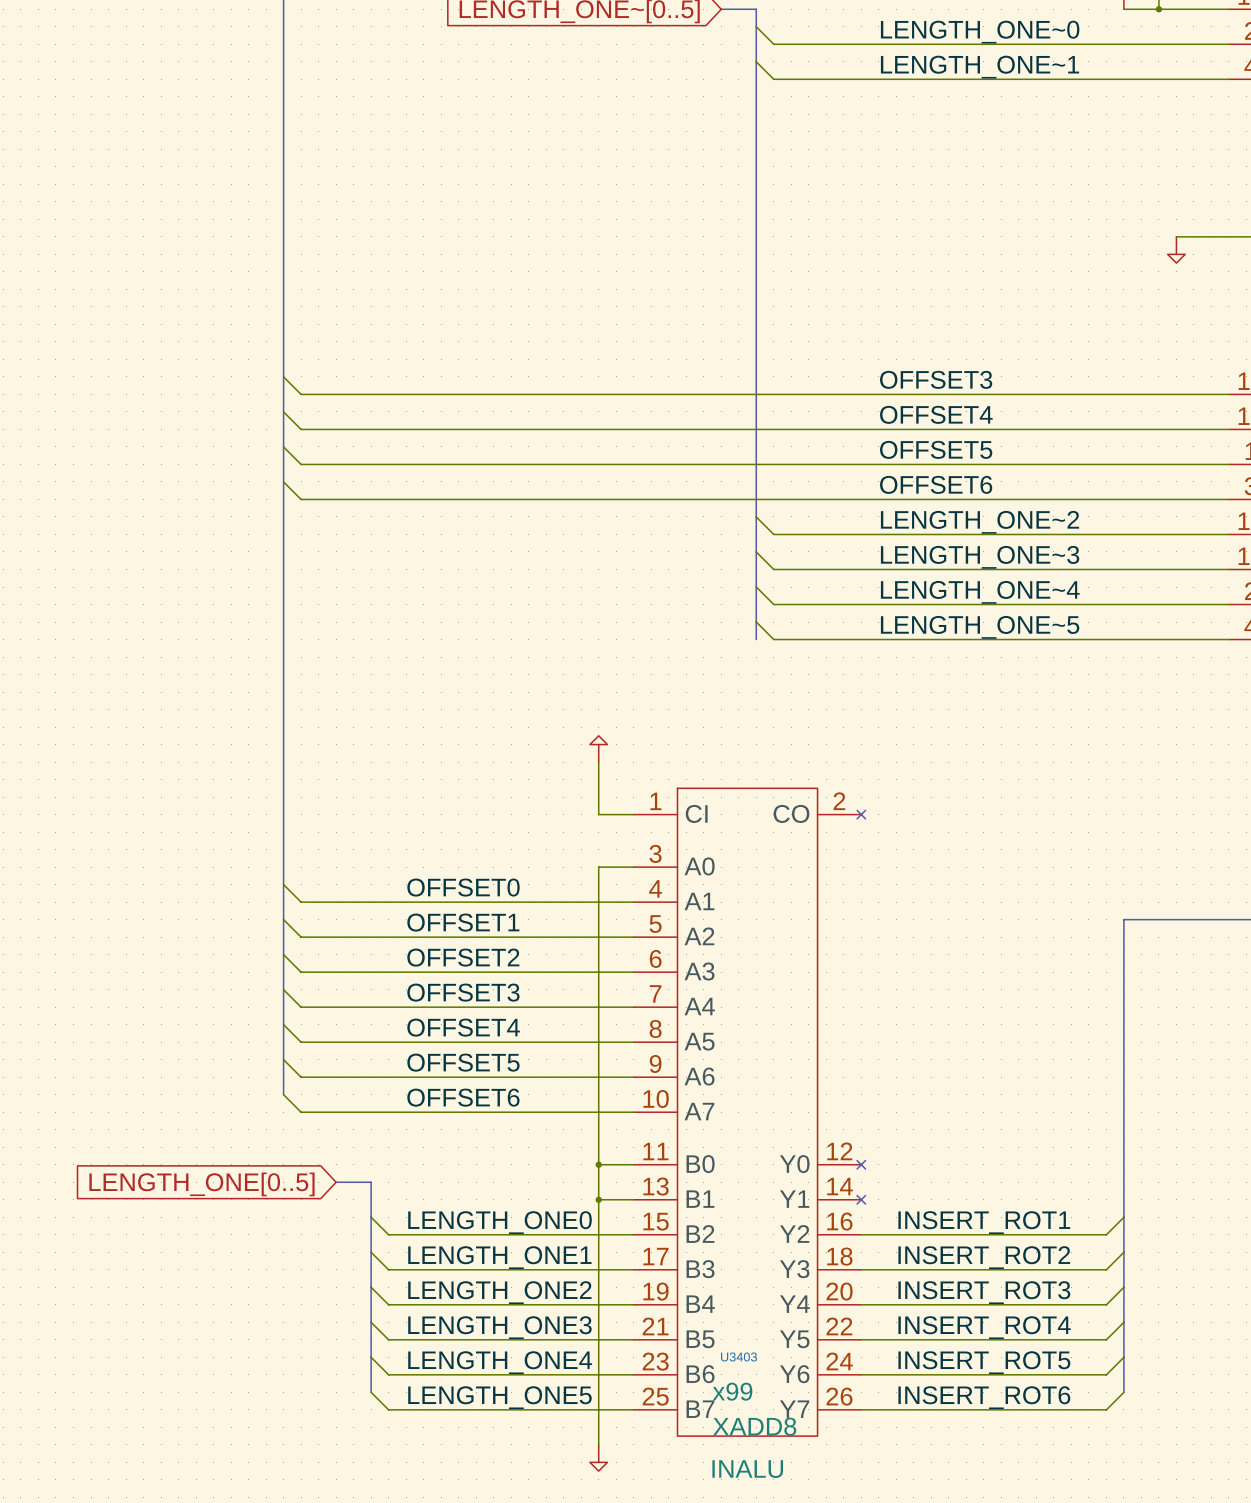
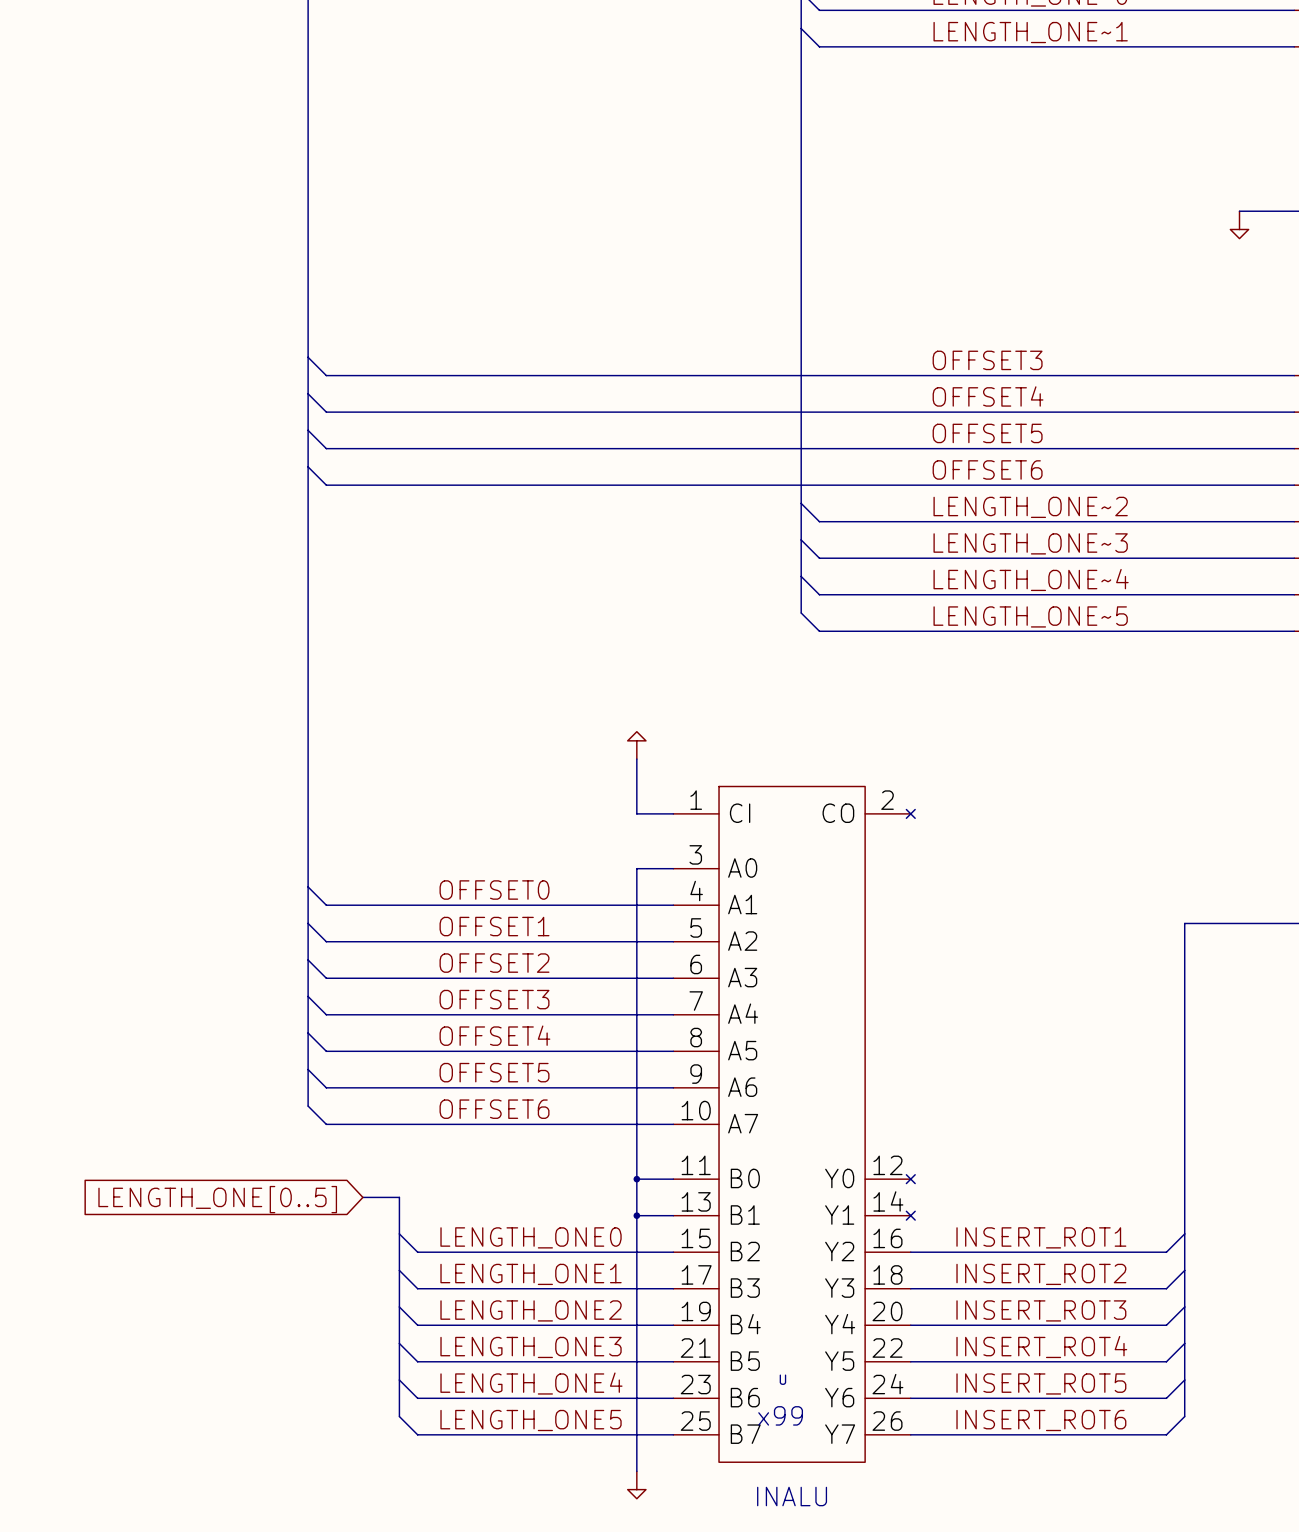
bus: (756, 622) (756, 639) -> none
U3403 name: U3403 (738, 1356) -> U (782, 1379)
U3403 value: XADD8 (754, 1426) -> none

